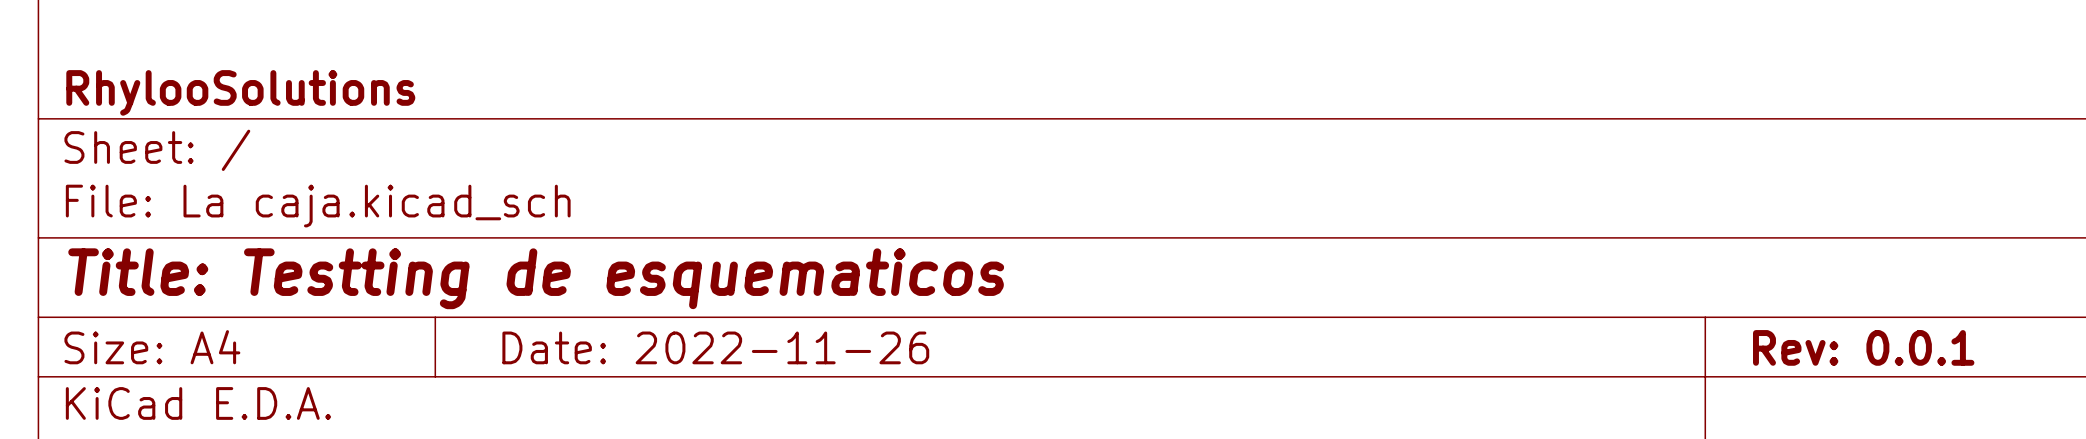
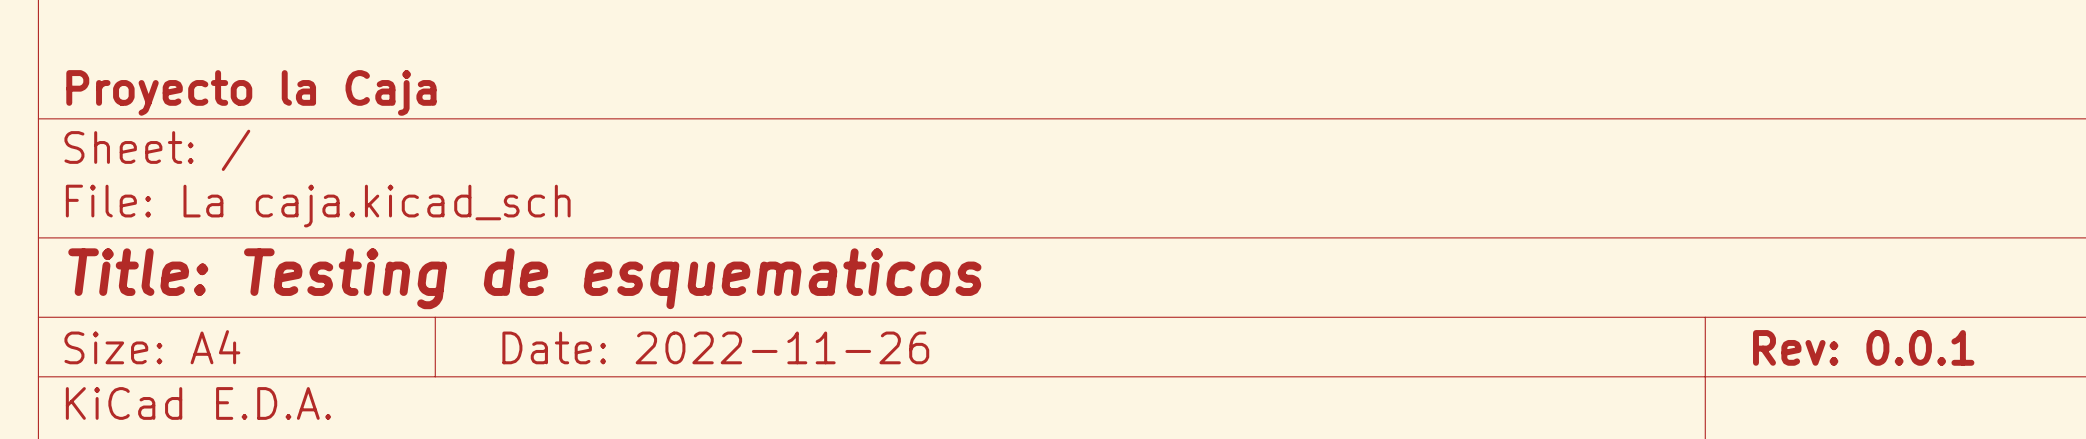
title block: RhylooSolutions (240, 92) -> Proyecto la Caja (251, 92)
title block: Title: Testting de esquematicos (536, 278) -> Title: Testing de esquematicos (524, 278)

